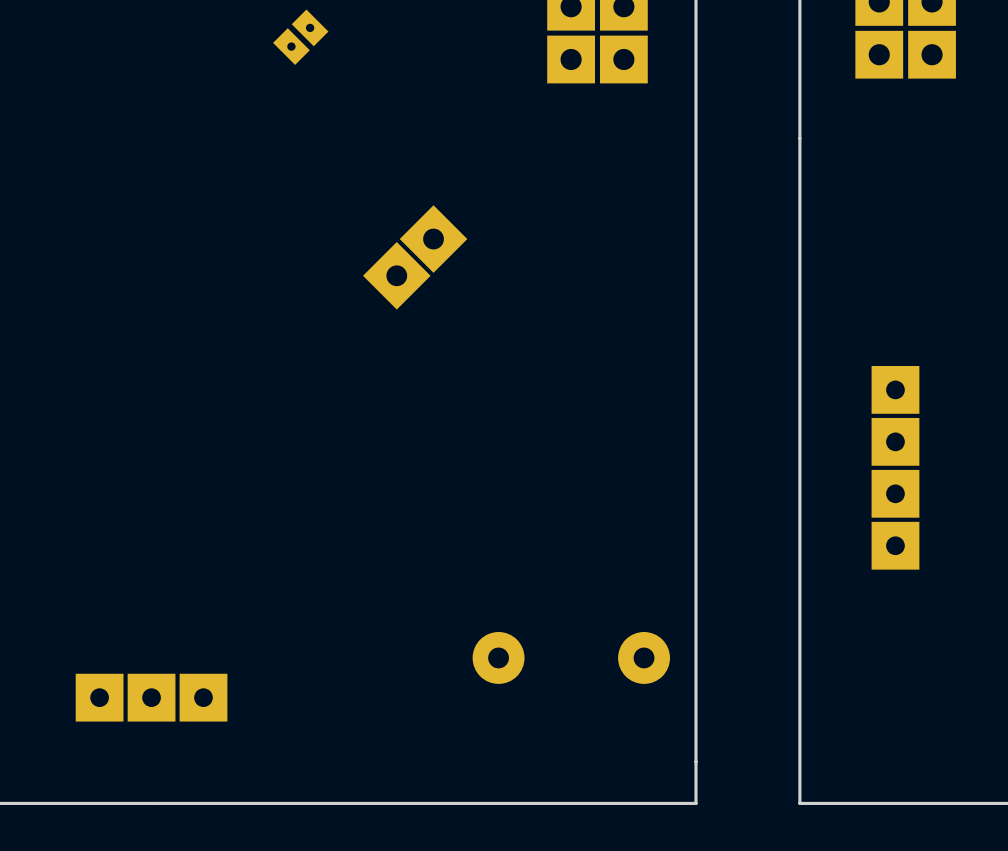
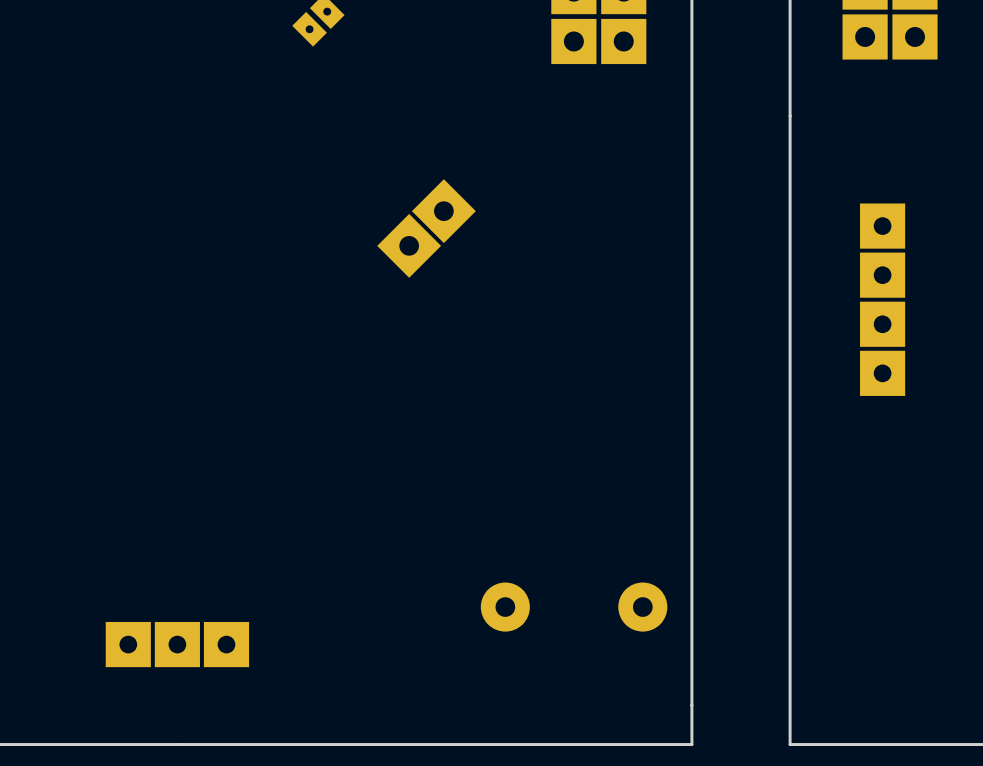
part position: (895, 467) -> (882, 299)

